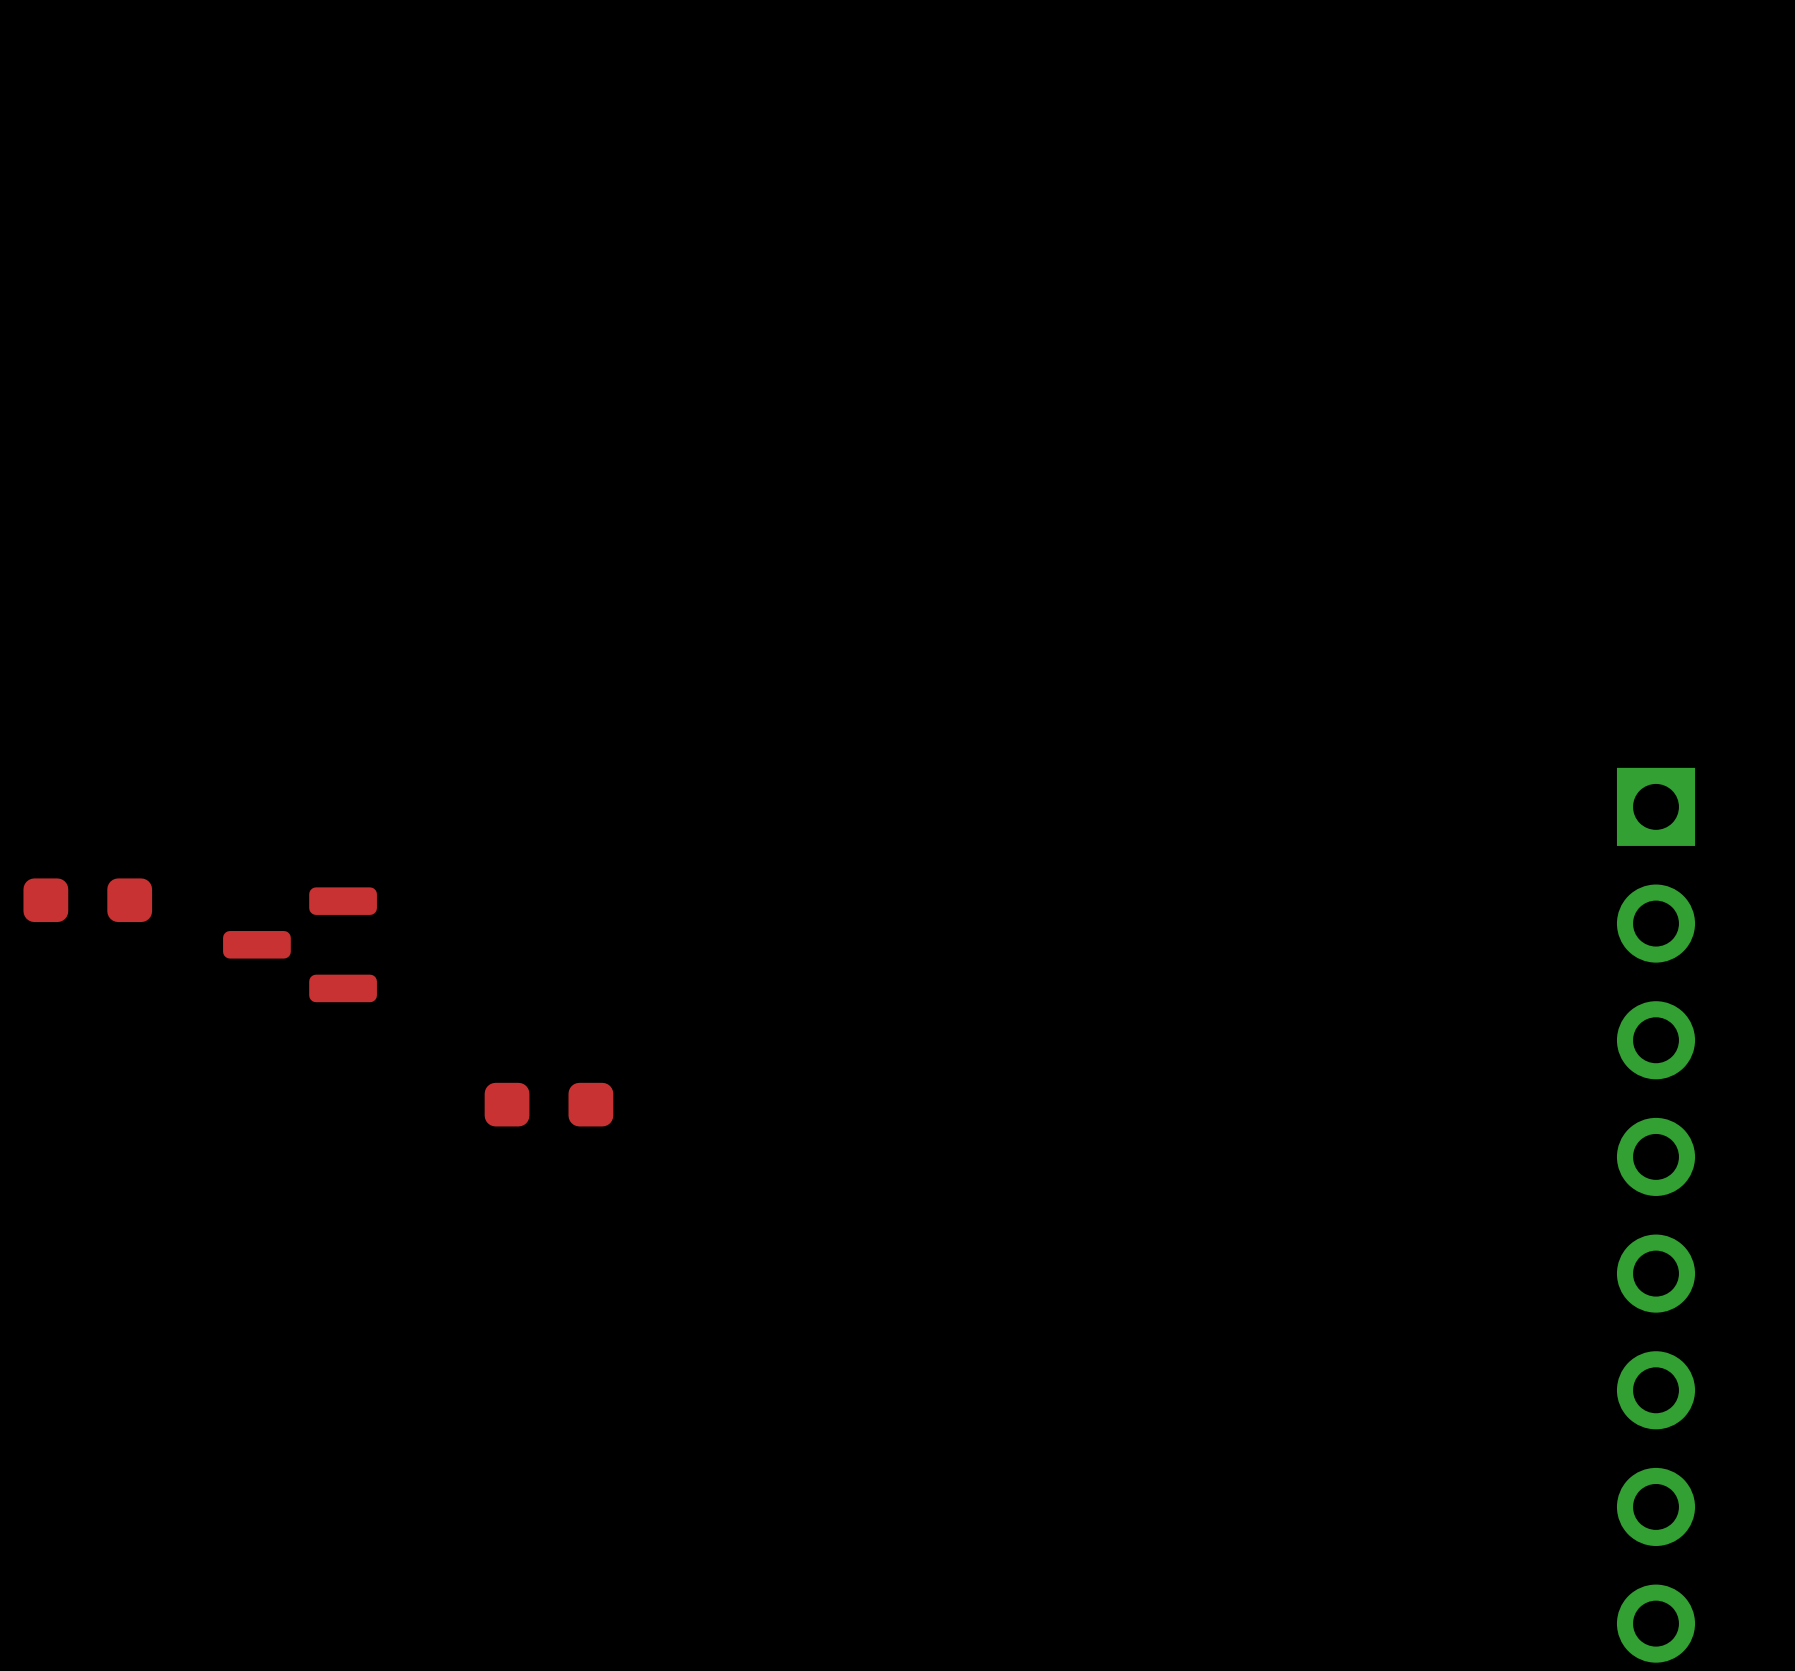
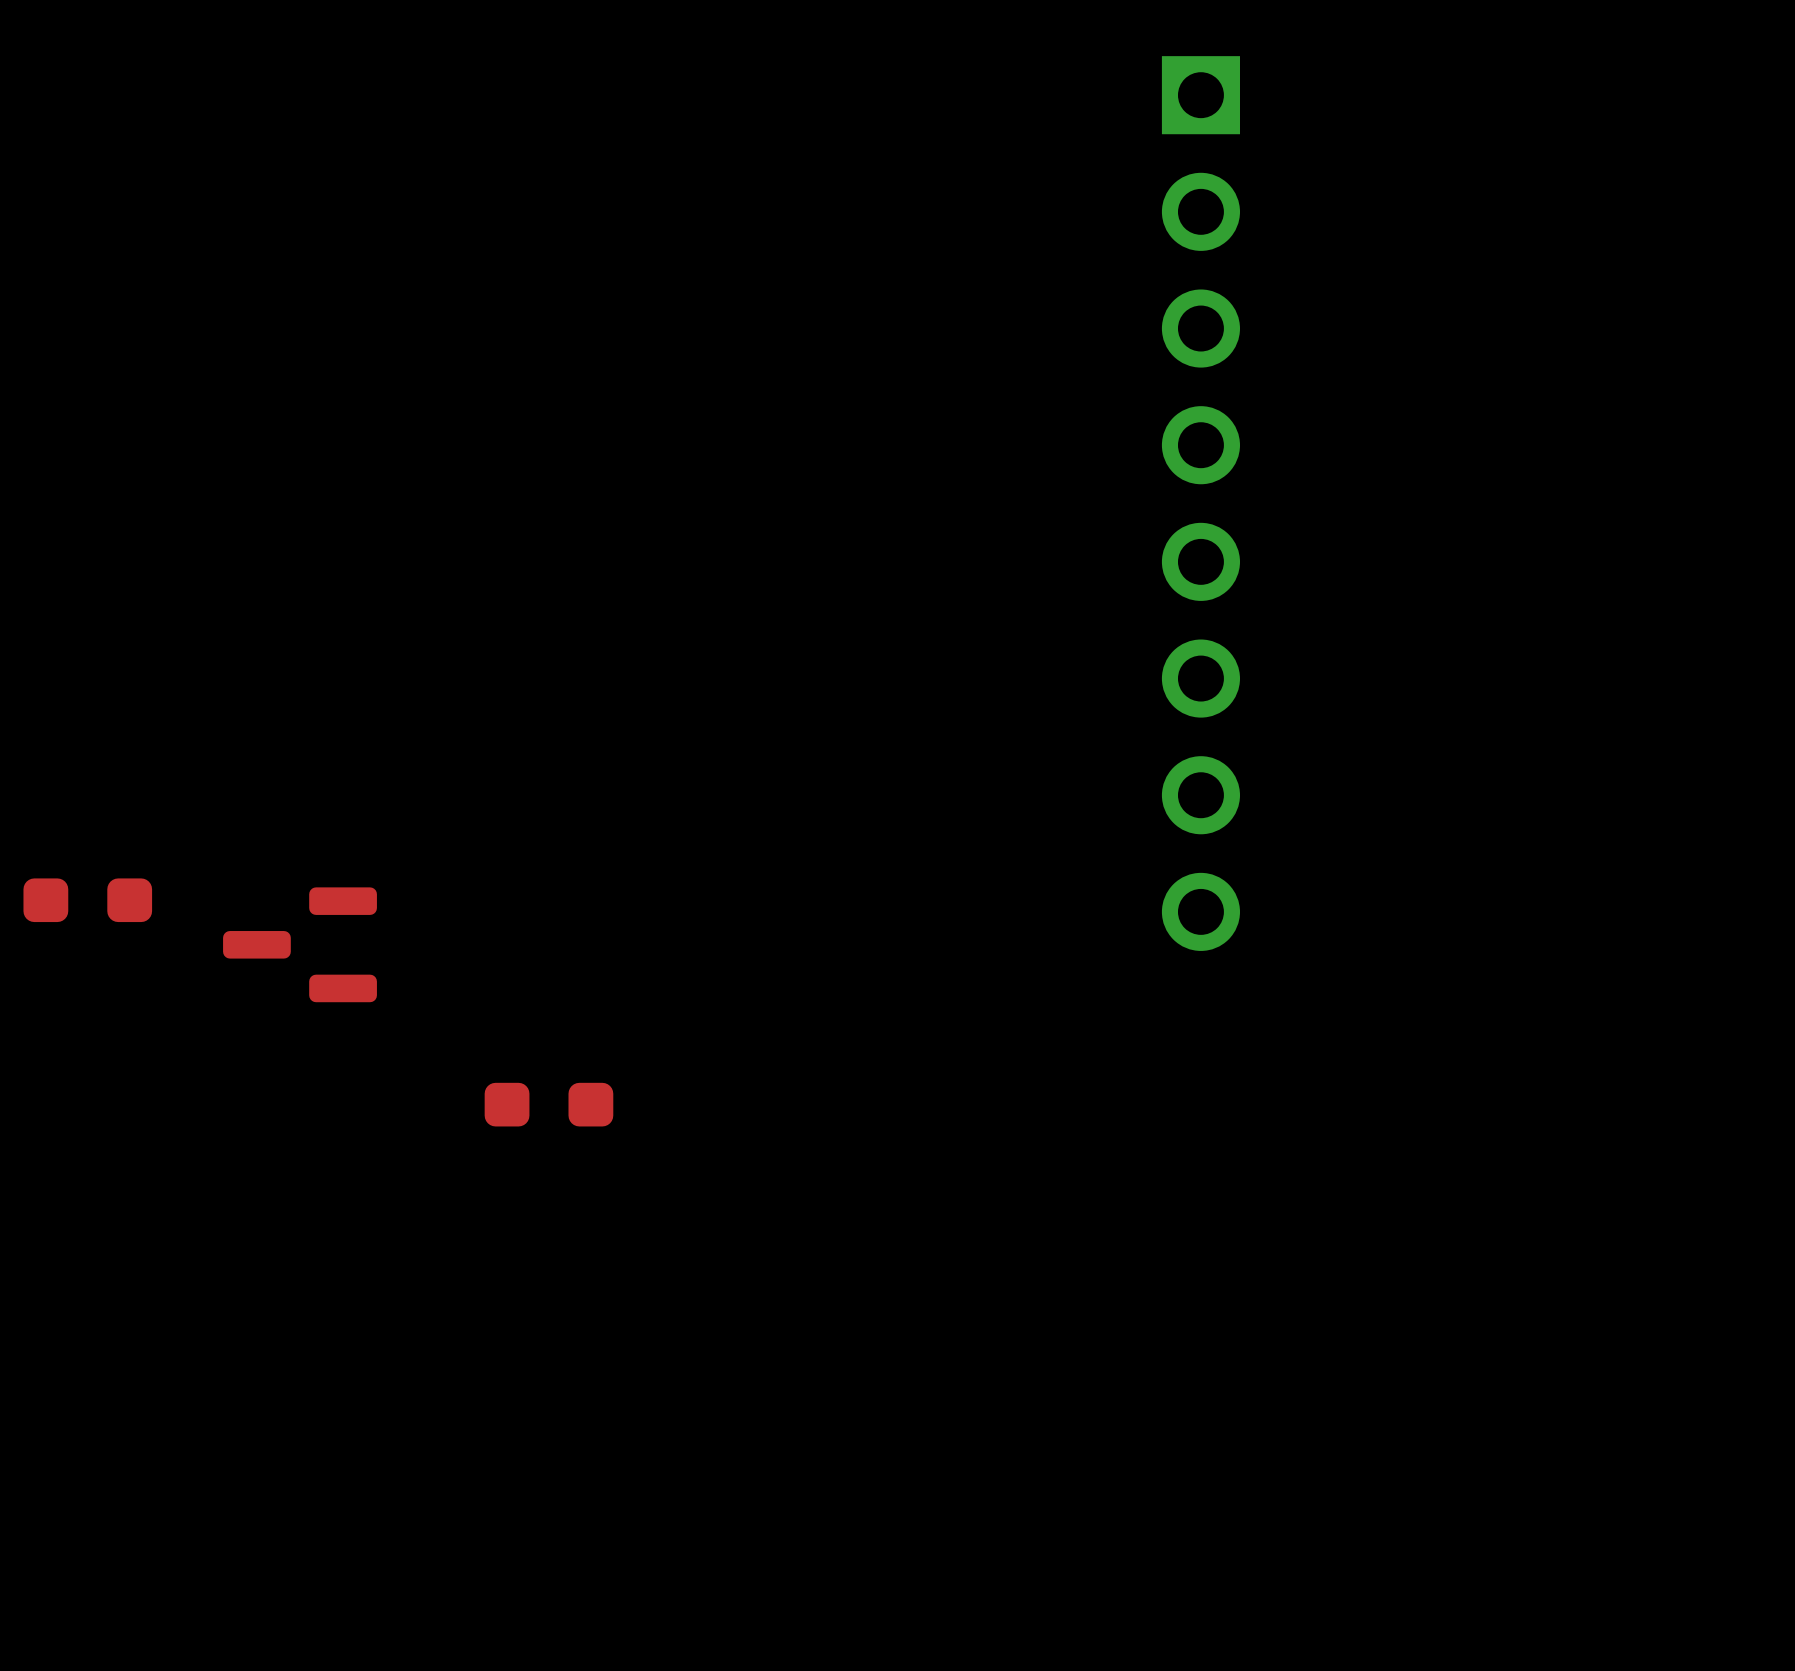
part position: (1655, 1215) -> (1200, 503)

